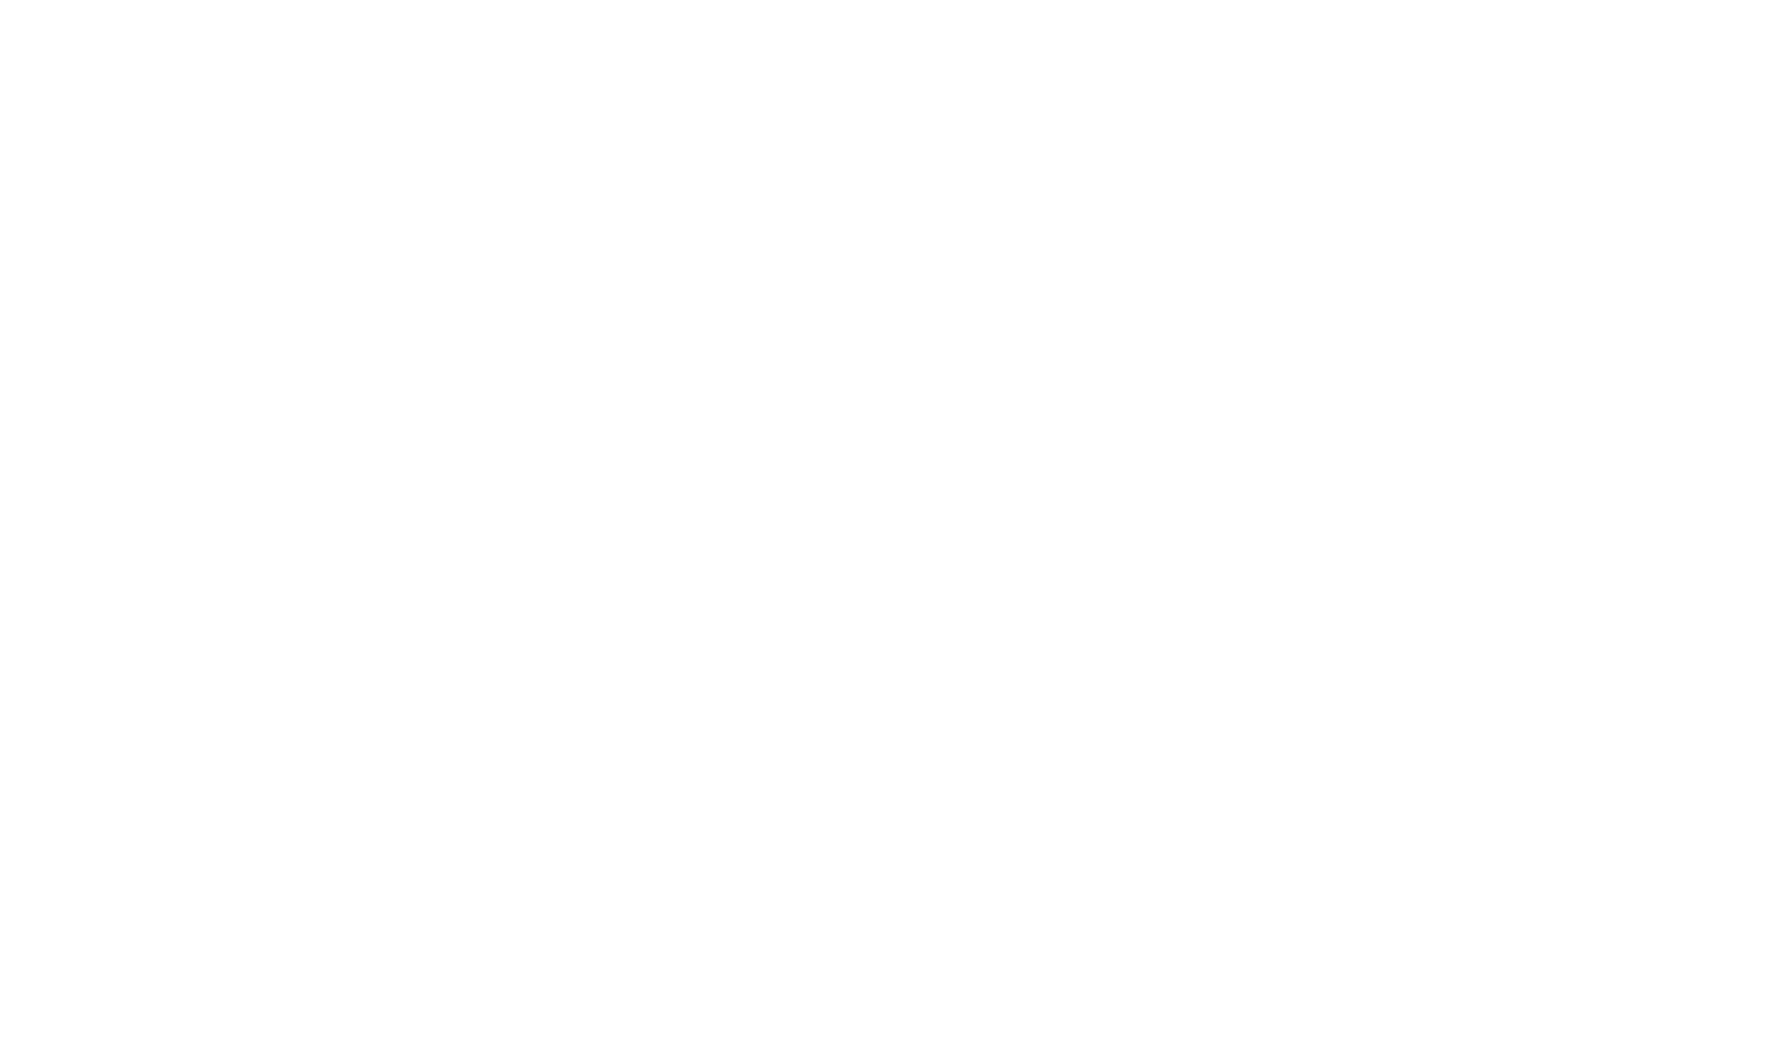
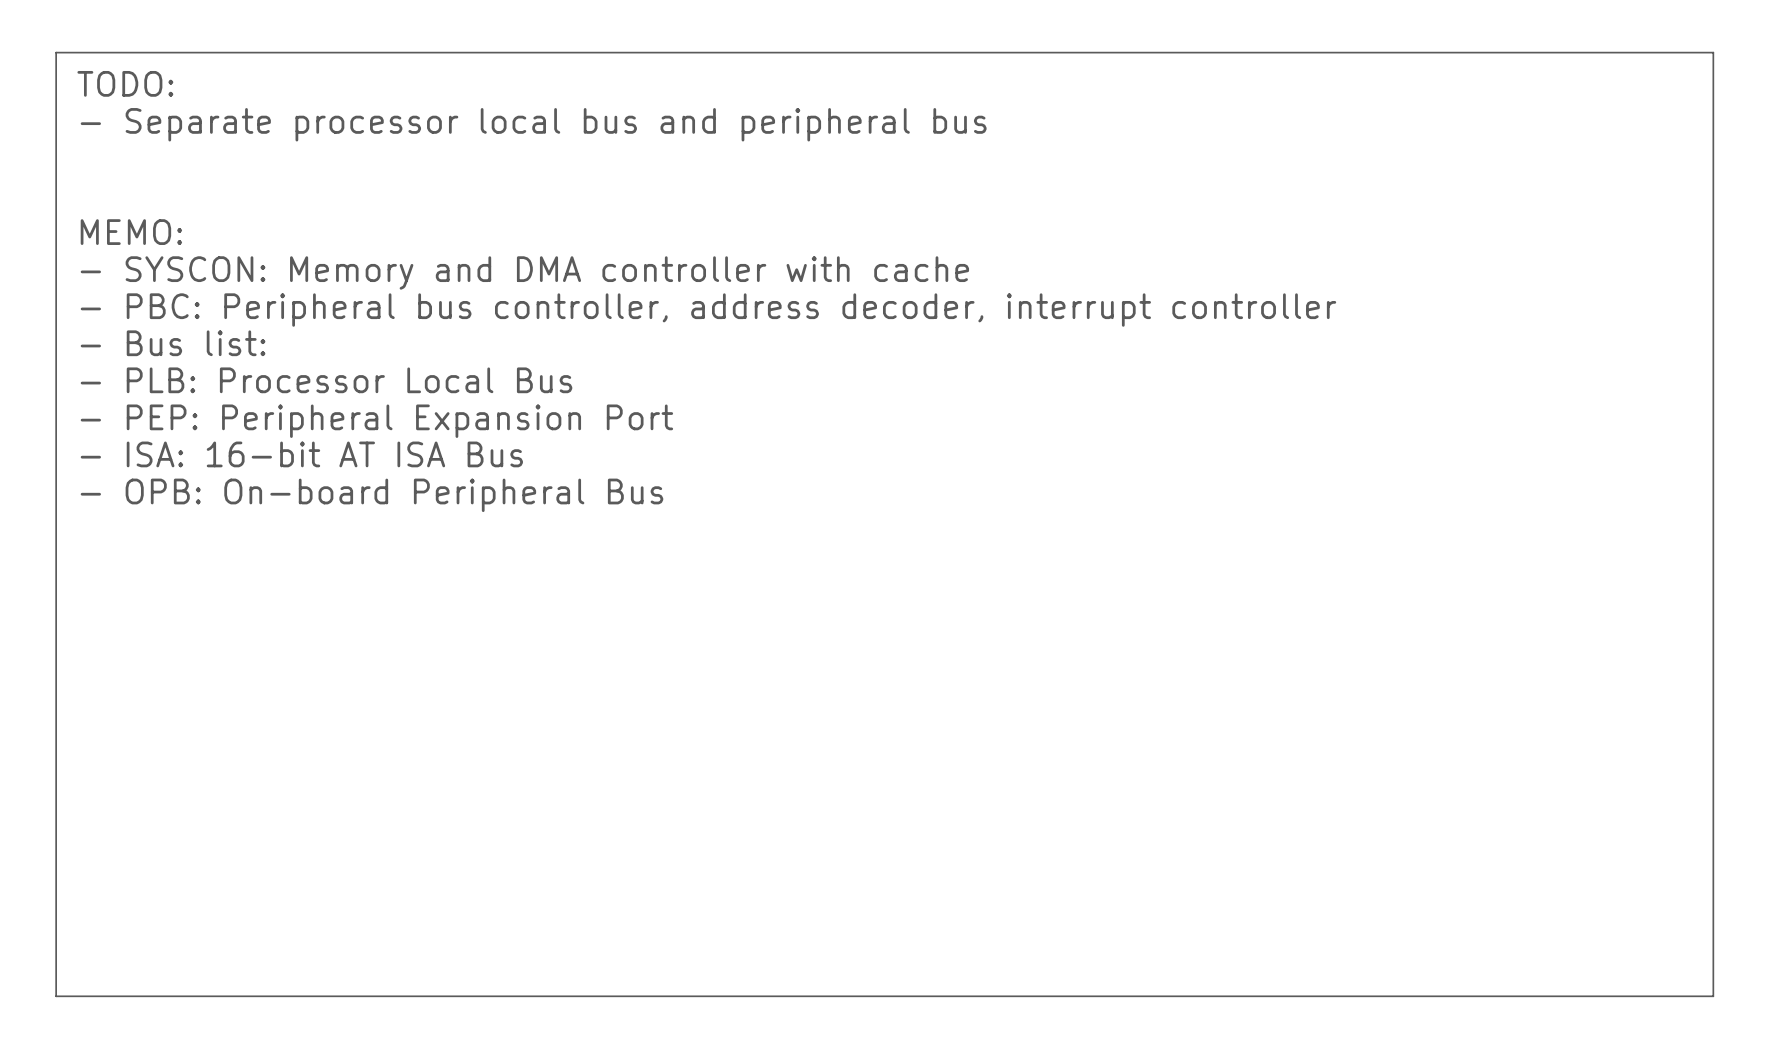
line: none -> (56, 52) (1713, 52) (1713, 996) (56, 996) (56, 52)
text: none -> TODO: (125, 83)
text: none -> - Separate processor local bus and peripheral bus (533, 124)
text: none -> MEMO: (131, 232)
text: none -> - SYSCON: Memory and DMA controller with cache (524, 272)
text: none -> - PBC: Peripheral bus controller, address decoder, interrupt controller (708, 310)
text: none -> - Bus list: (173, 343)
text: none -> - PLB: Processor Local Bus (326, 380)
text: none -> - PEP: Peripheral Expansion Port (376, 421)
text: none -> - ISA: 16-bit AT ISA Bus (301, 454)
text: none -> - OPB: On-board Peripheral Bus (371, 495)

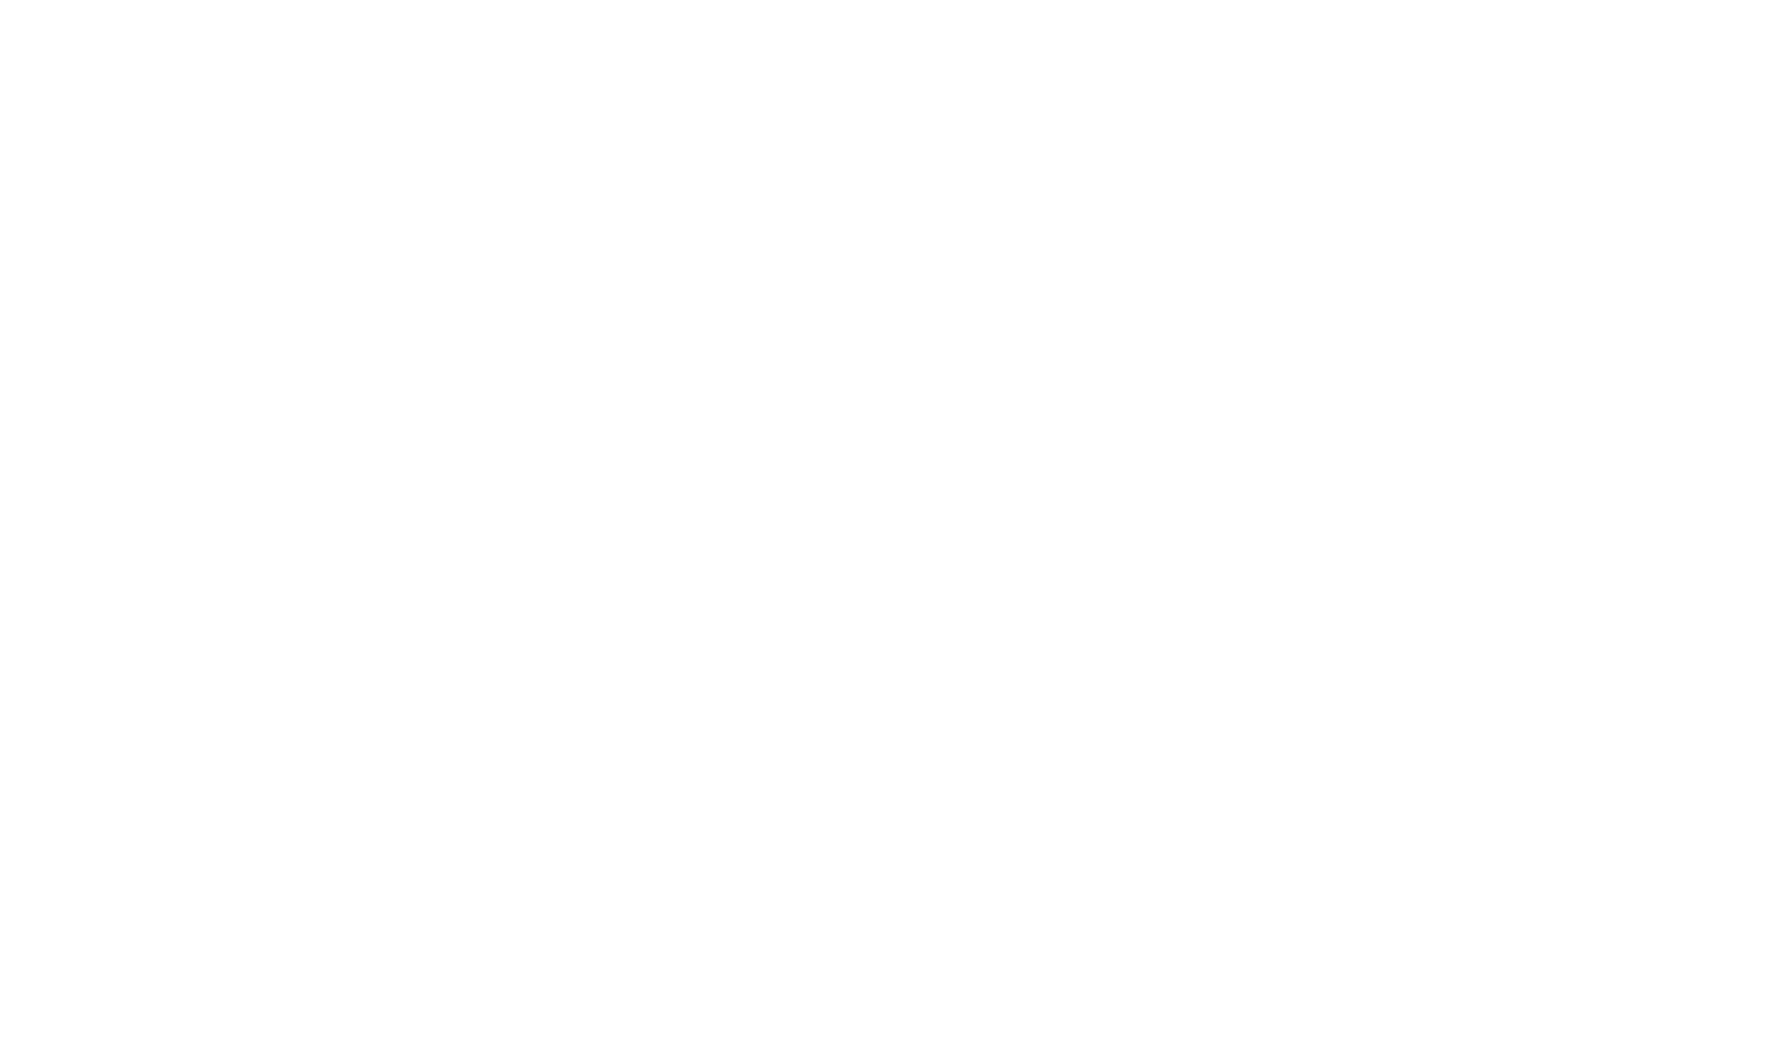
line: (56, 52) (1713, 52) (1713, 996) (56, 996) (56, 52) -> none
text: TODO: (125, 83) -> none
text: - Separate processor local bus and peripheral bus (533, 124) -> none
text: MEMO: (131, 232) -> none
text: - SYSCON: Memory and DMA controller with cache (524, 272) -> none
text: - PBC: Peripheral bus controller, address decoder, interrupt controller (708, 310) -> none
text: - Bus list: (173, 343) -> none
text: - PLB: Processor Local Bus (326, 380) -> none
text: - PEP: Peripheral Expansion Port (376, 421) -> none
text: - ISA: 16-bit AT ISA Bus (301, 454) -> none
text: - OPB: On-board Peripheral Bus (371, 495) -> none

